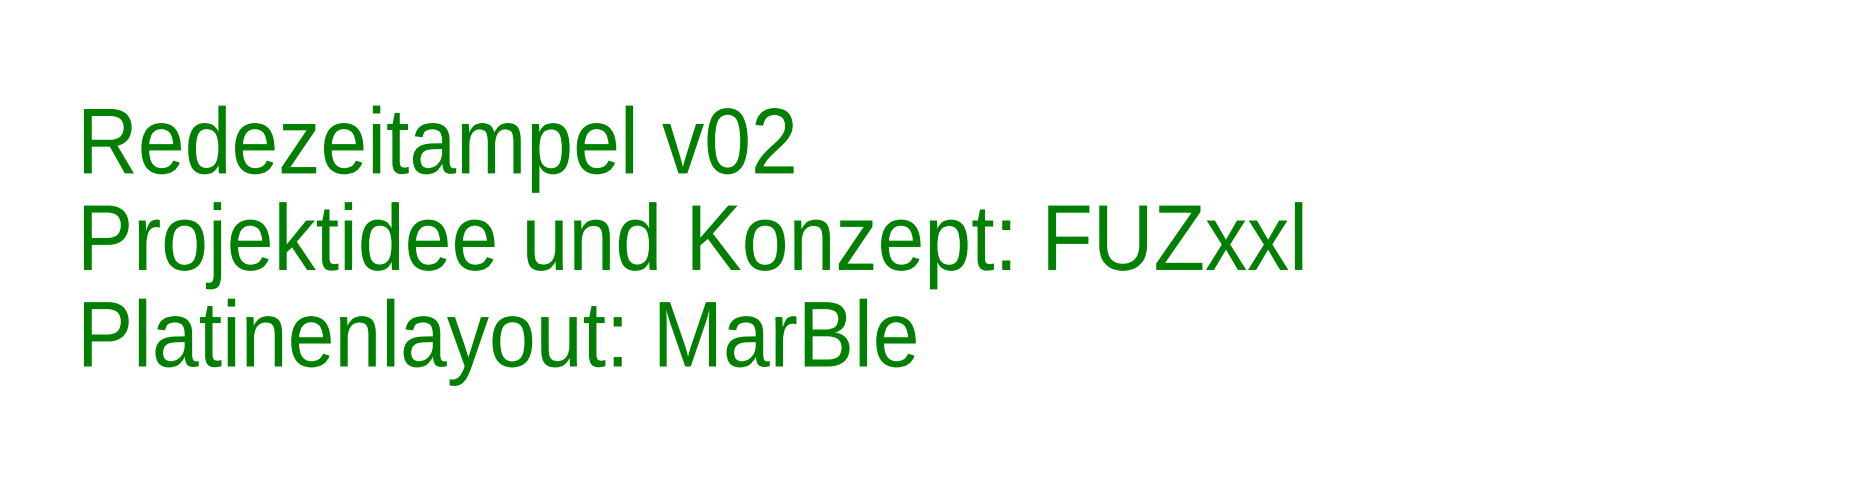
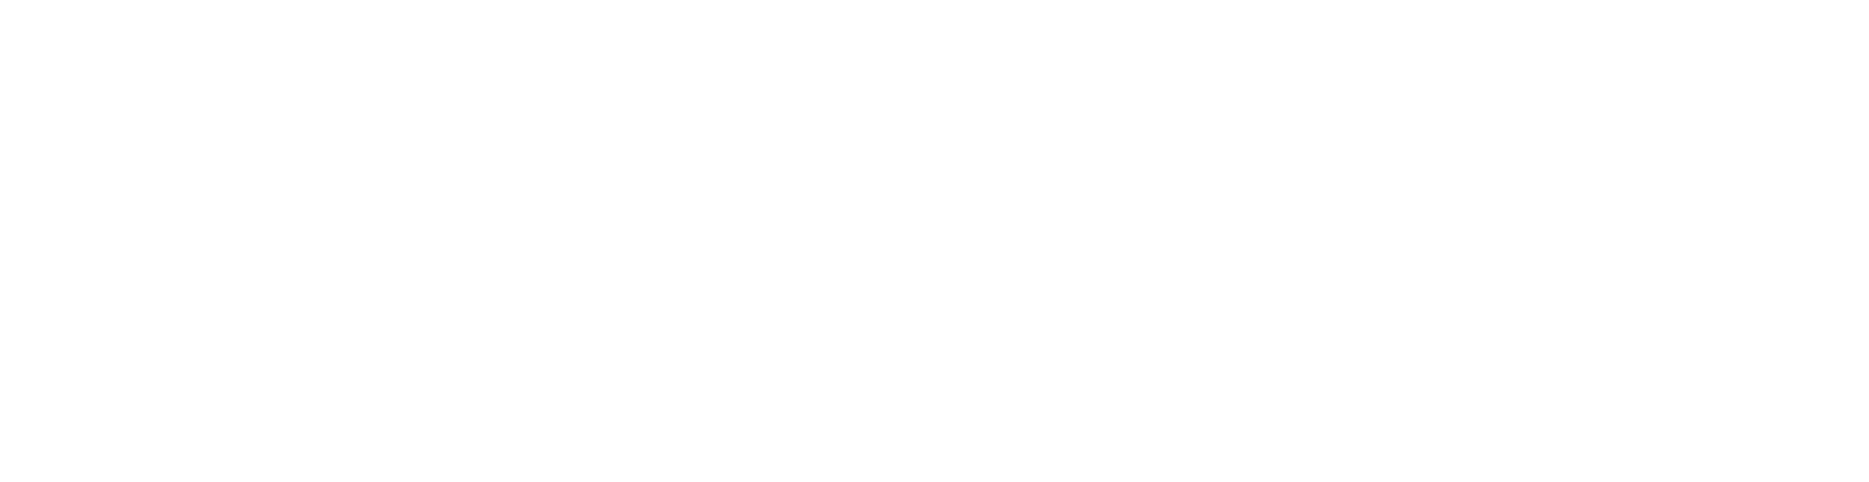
text: Redezeitampel v02 (438, 149) -> none
text: Projektidee und Konzept: FUZxxl (693, 245) -> none
text: Platinenlayout: MarBle (499, 342) -> none

